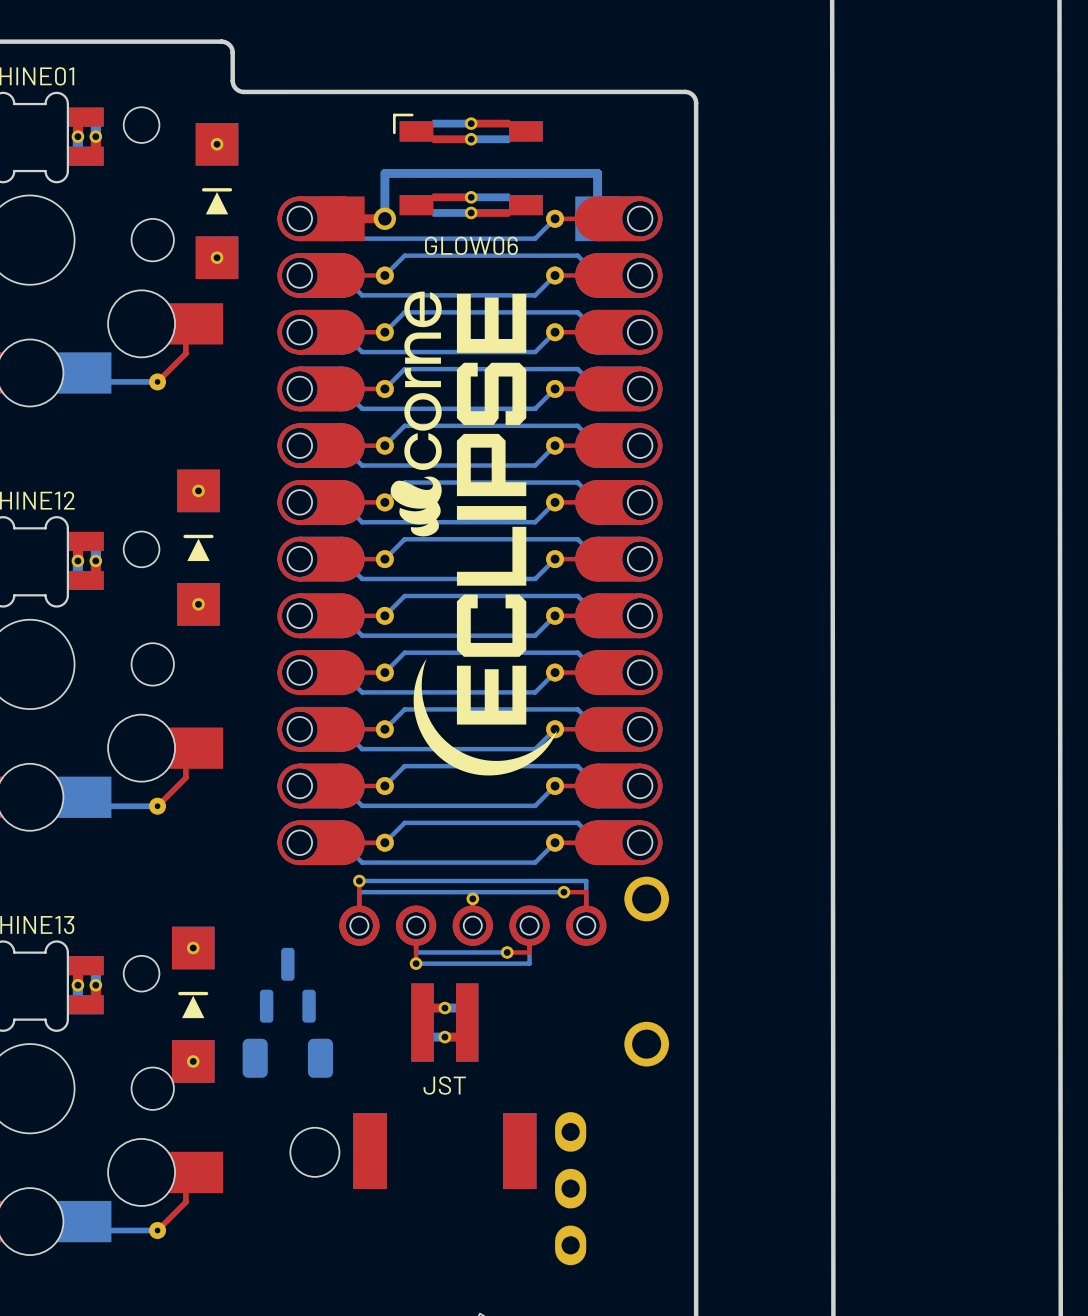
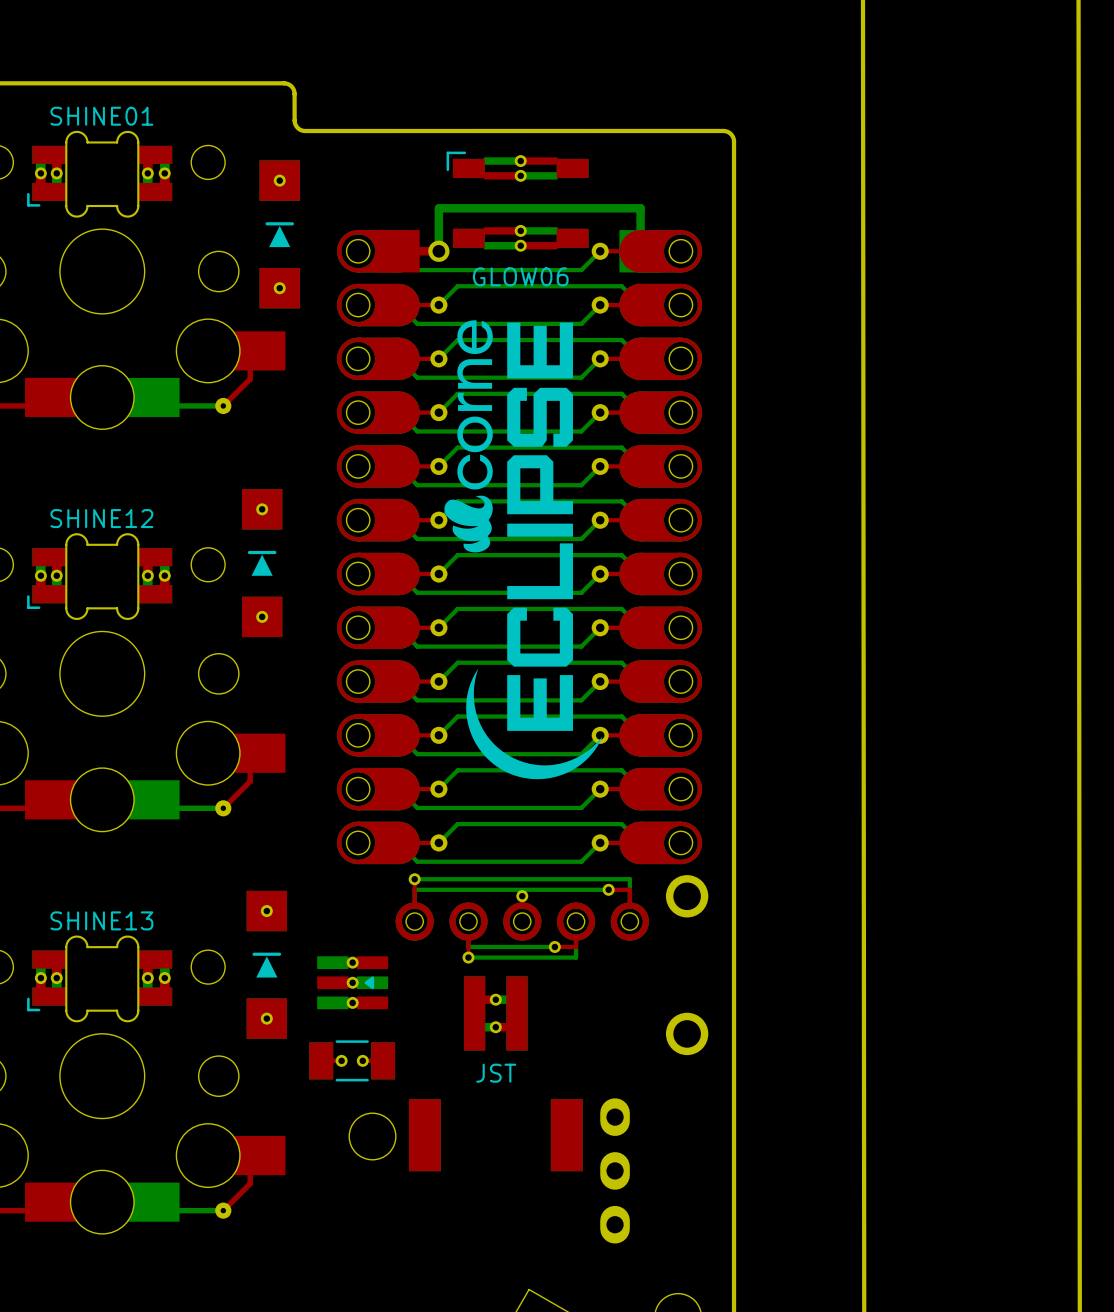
part footprint: [259, 947, 316, 1023] -> [317, 956, 389, 1010]
part position: (193, 1004) -> (266, 964)
part footprint: [242, 1038, 334, 1078] -> [309, 1040, 396, 1082]

